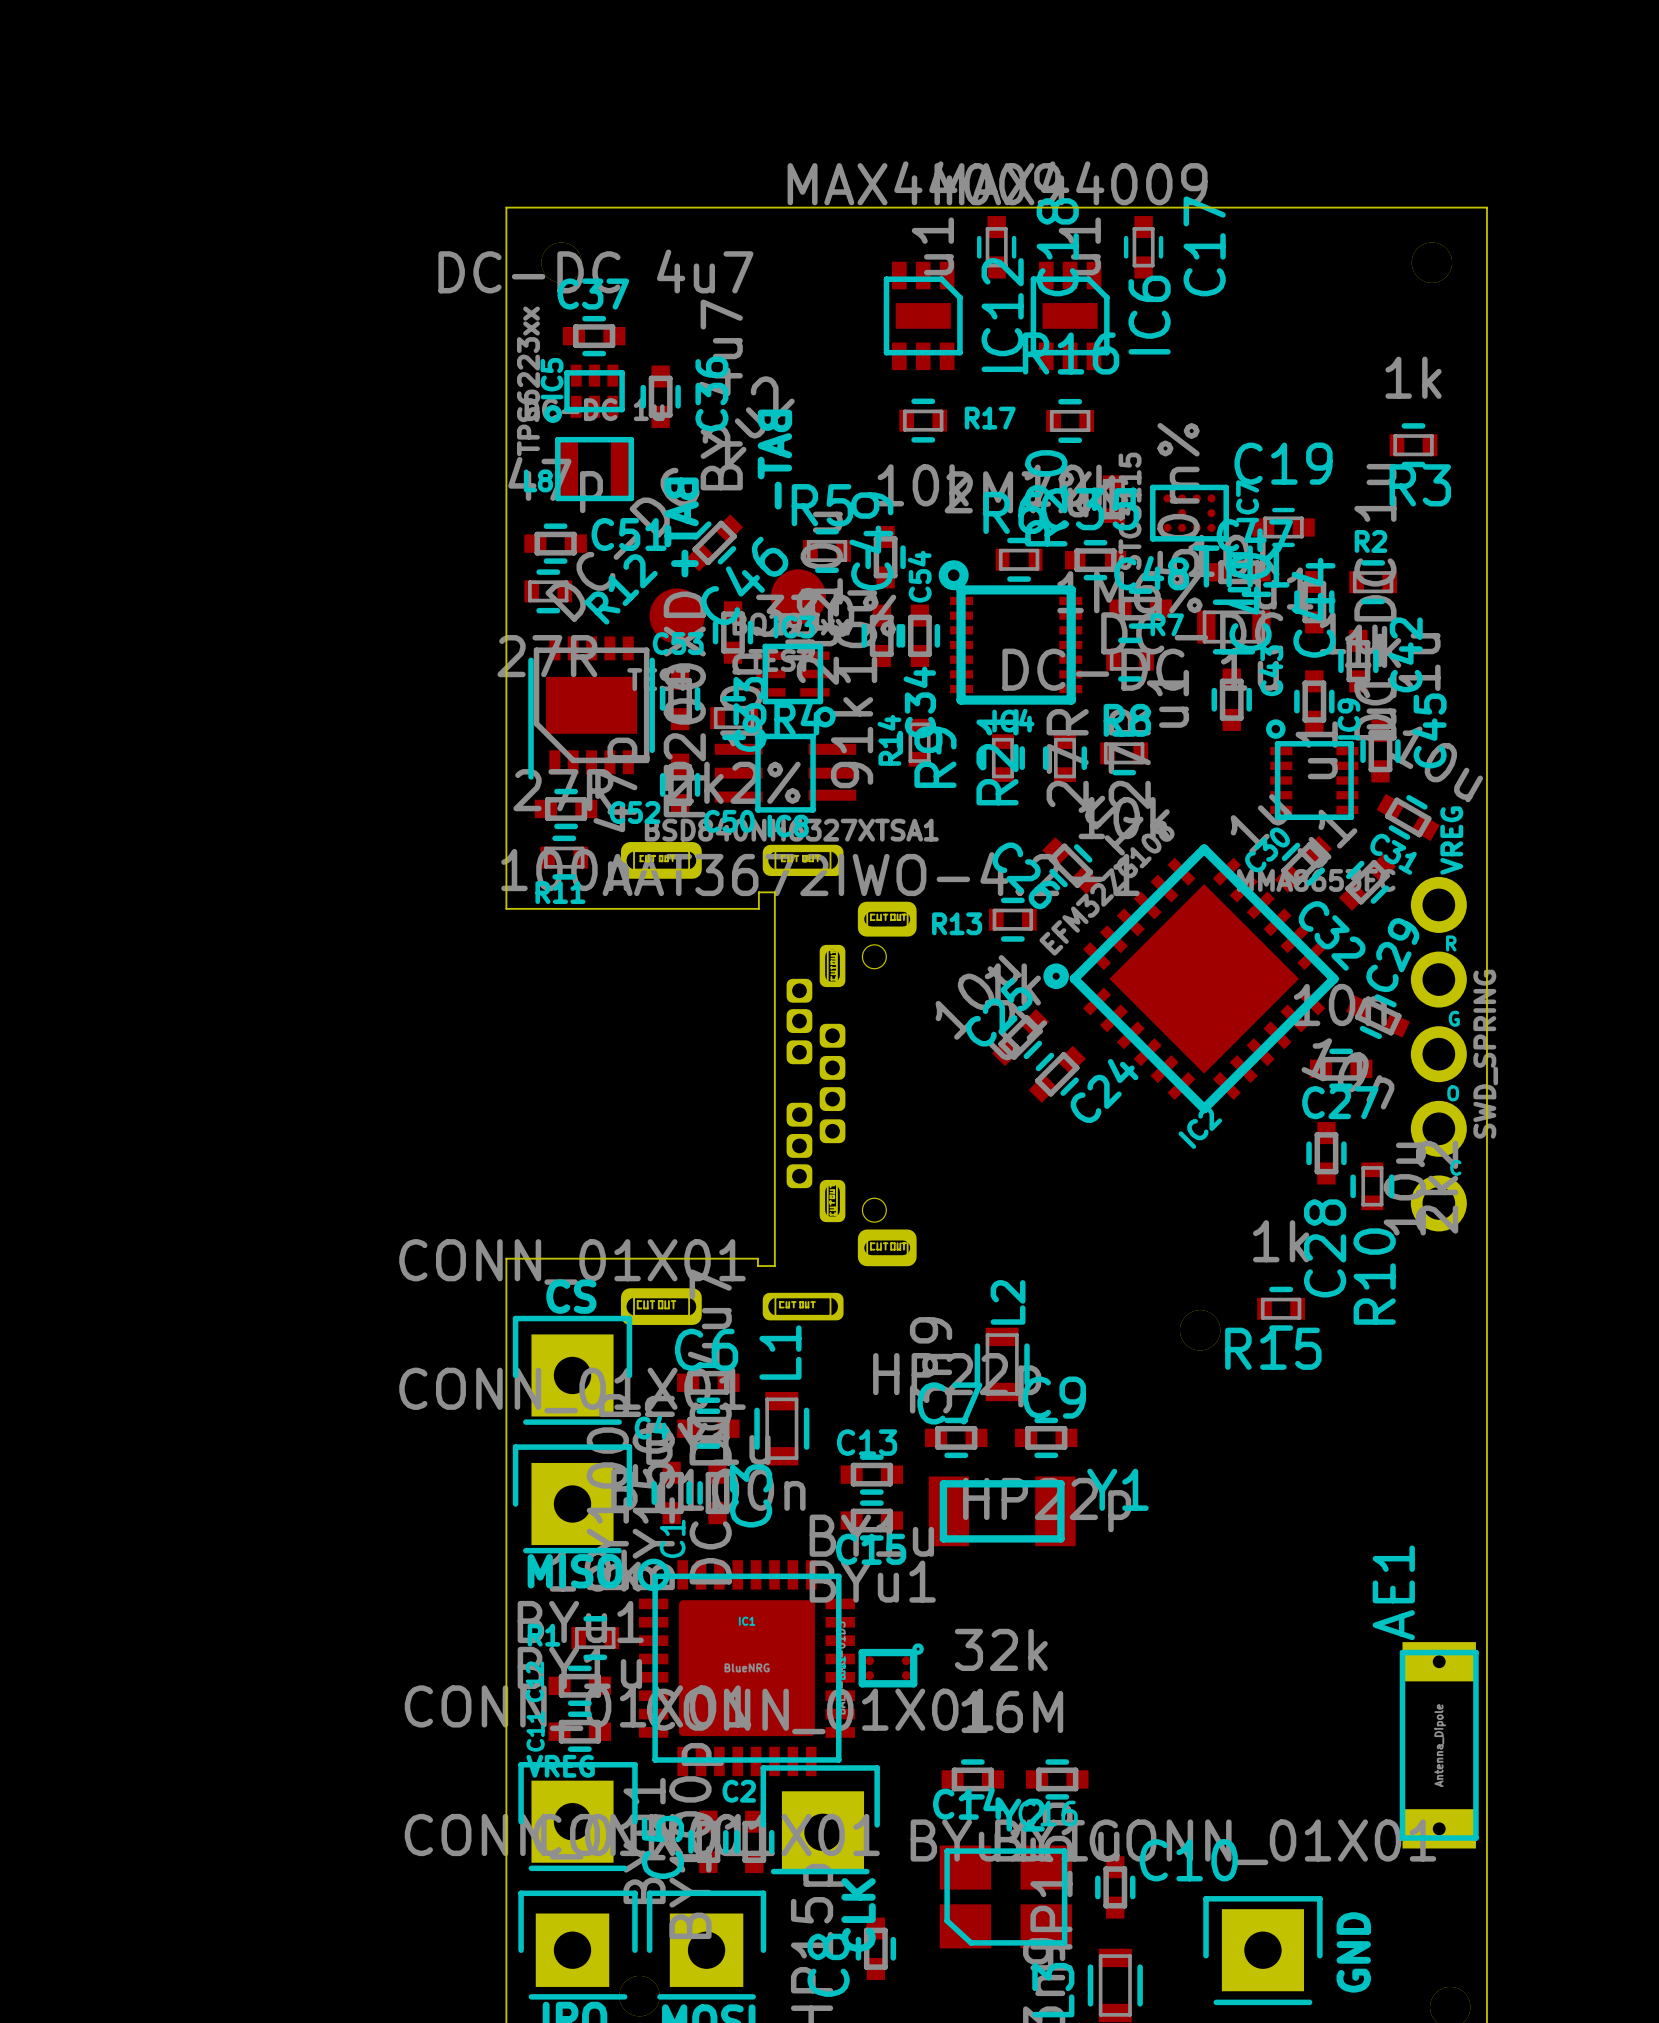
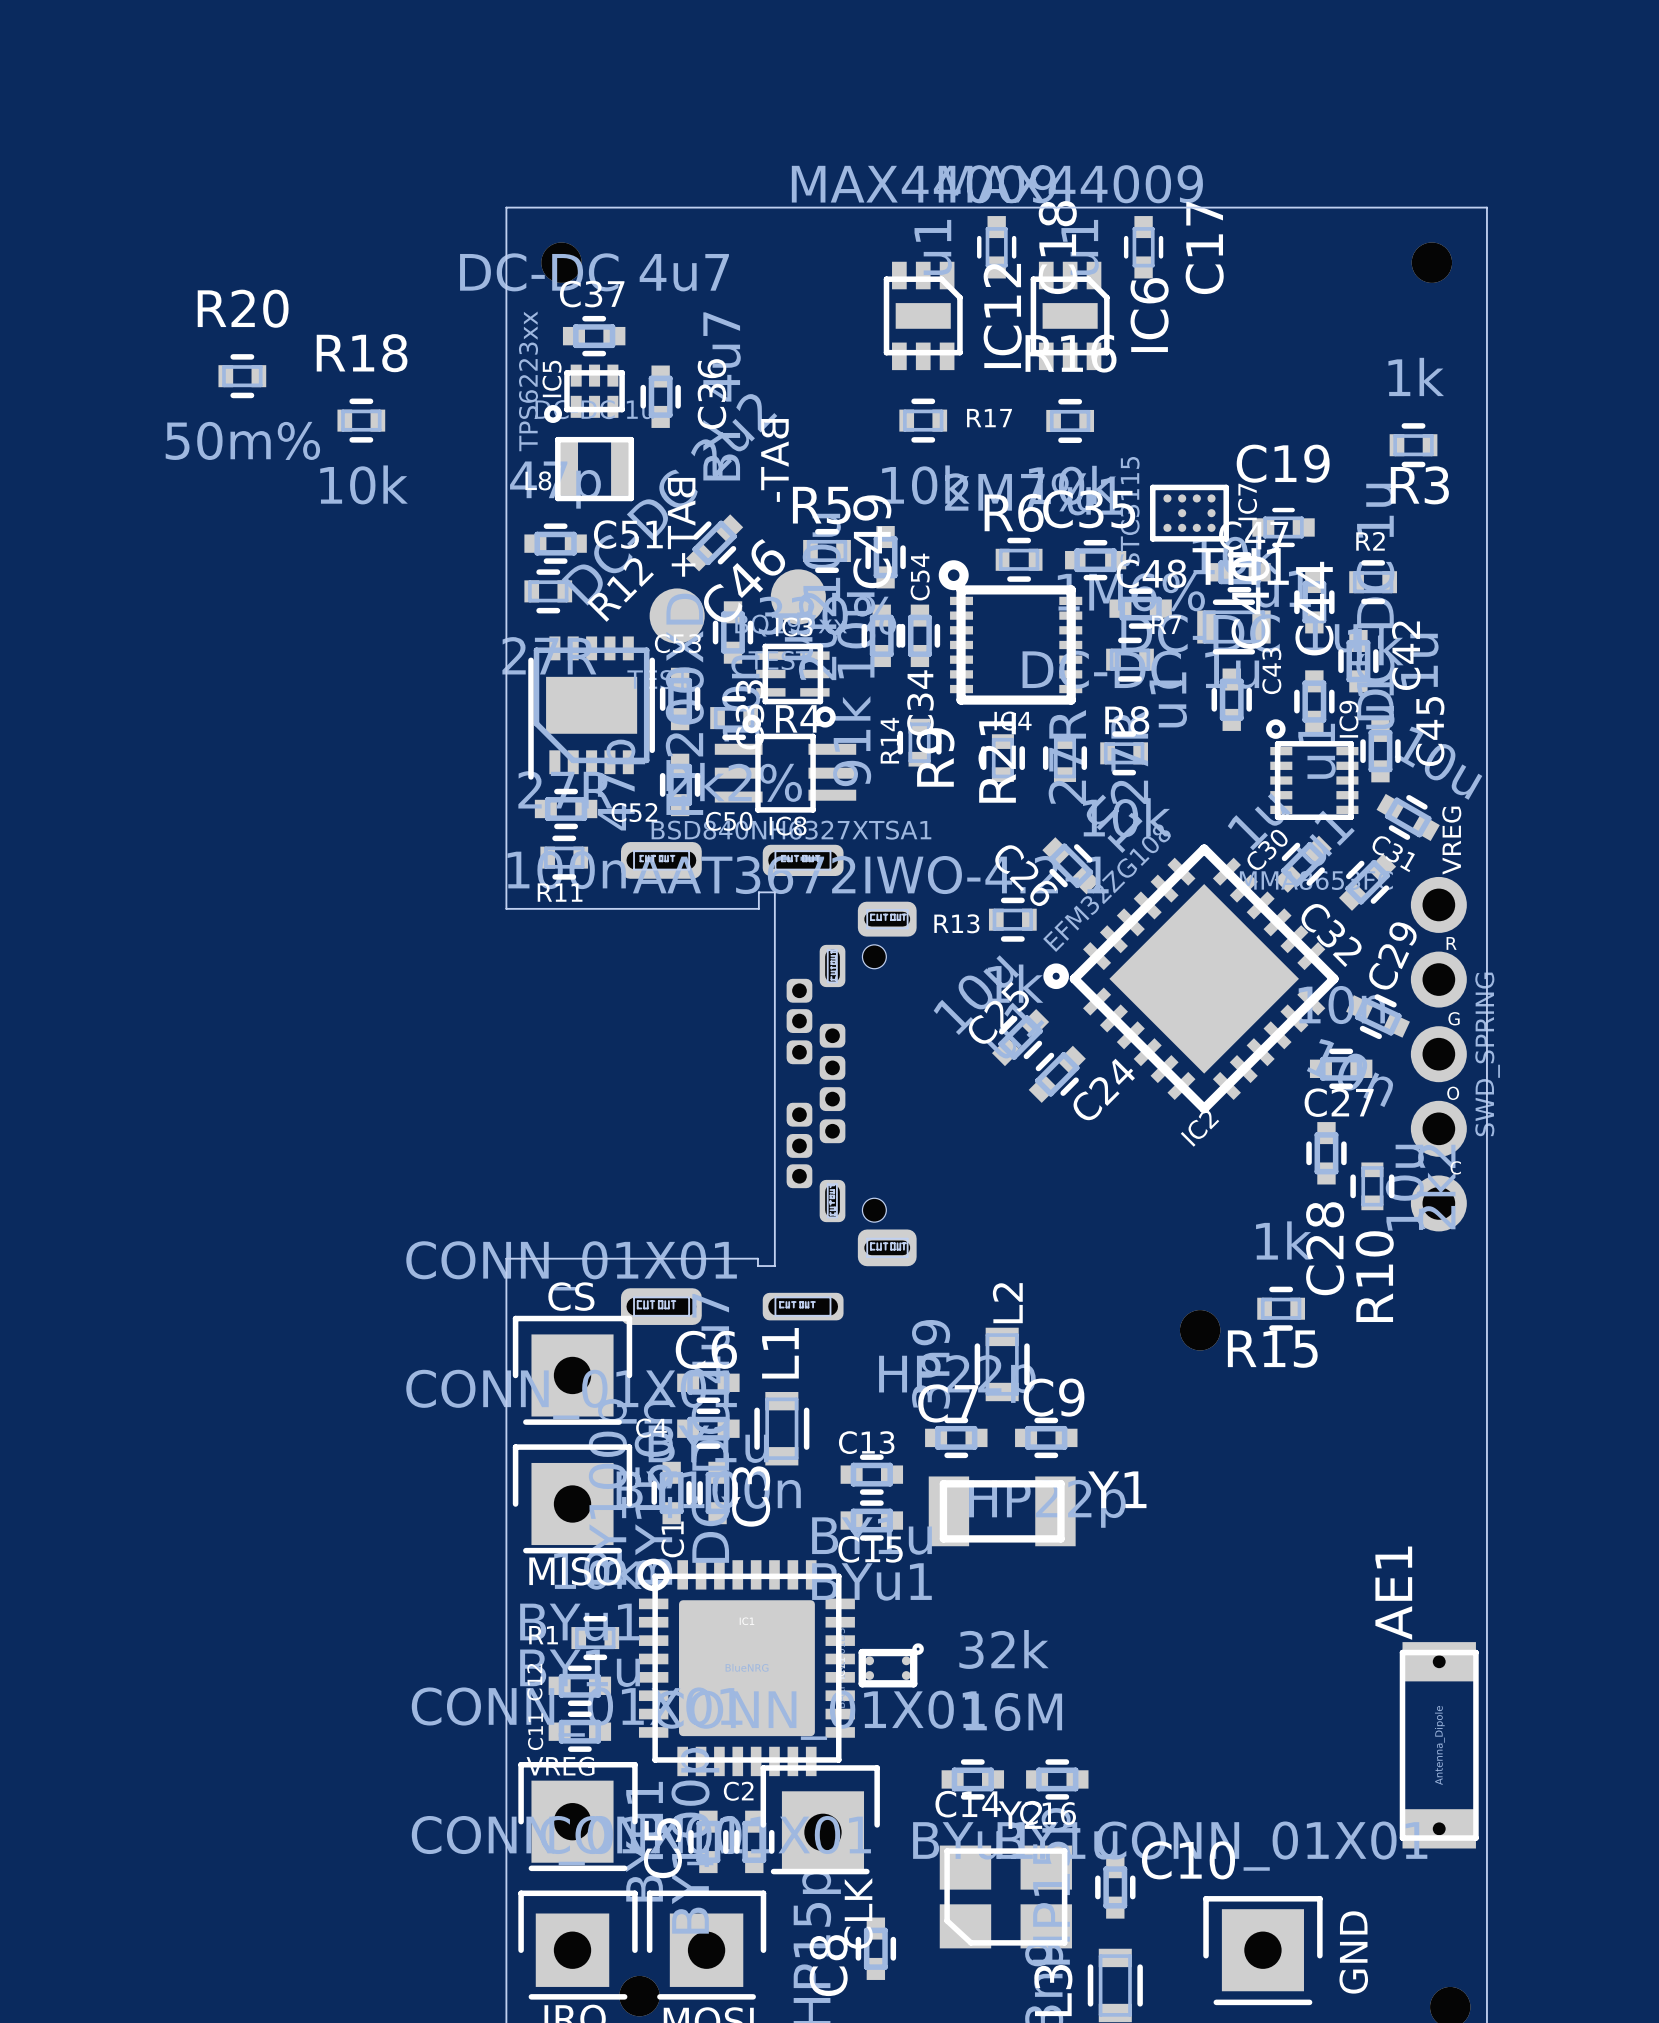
R18: none -> 10k (361, 420)
R20 rotation: 0° (1113, 499) -> 90° clockwise (242, 376)
R20 position: (1113, 499) -> (242, 376)

